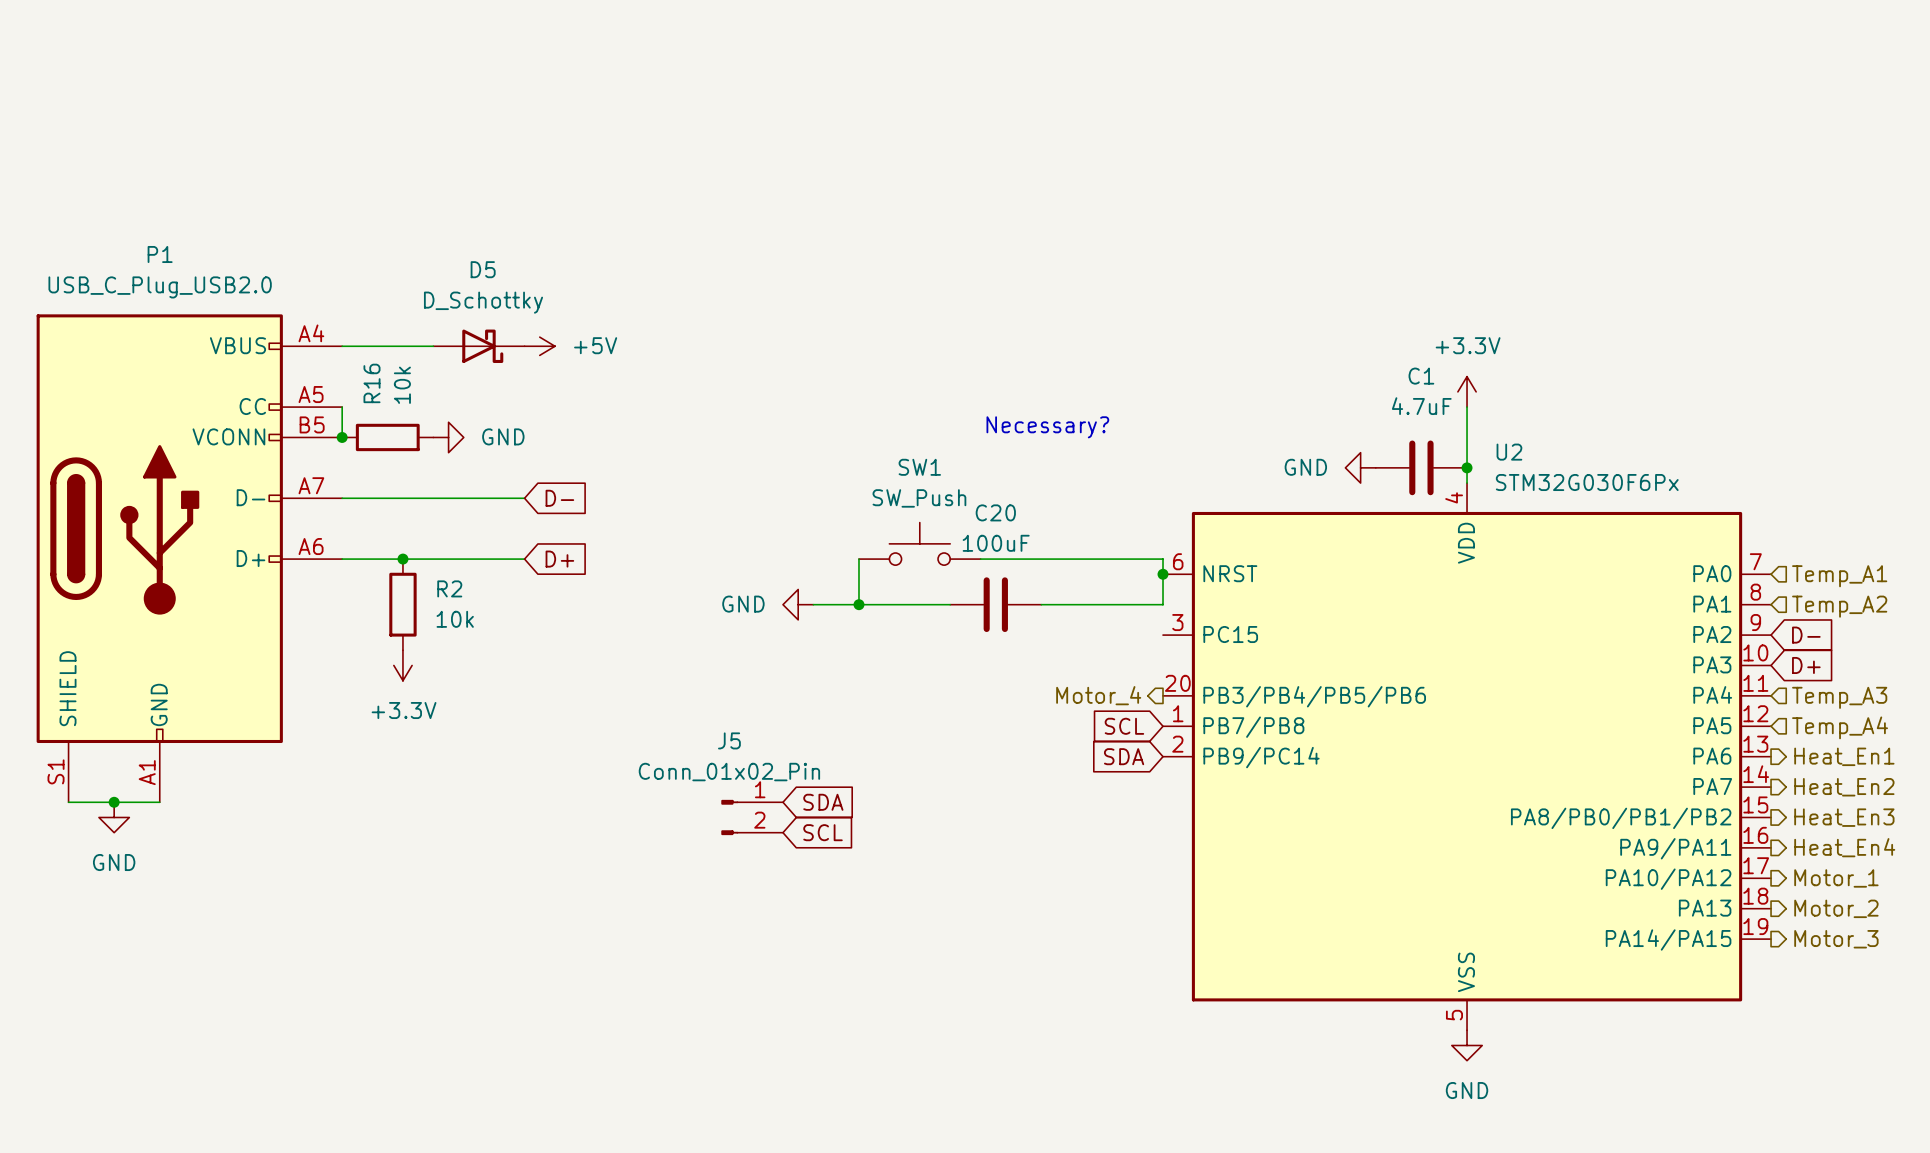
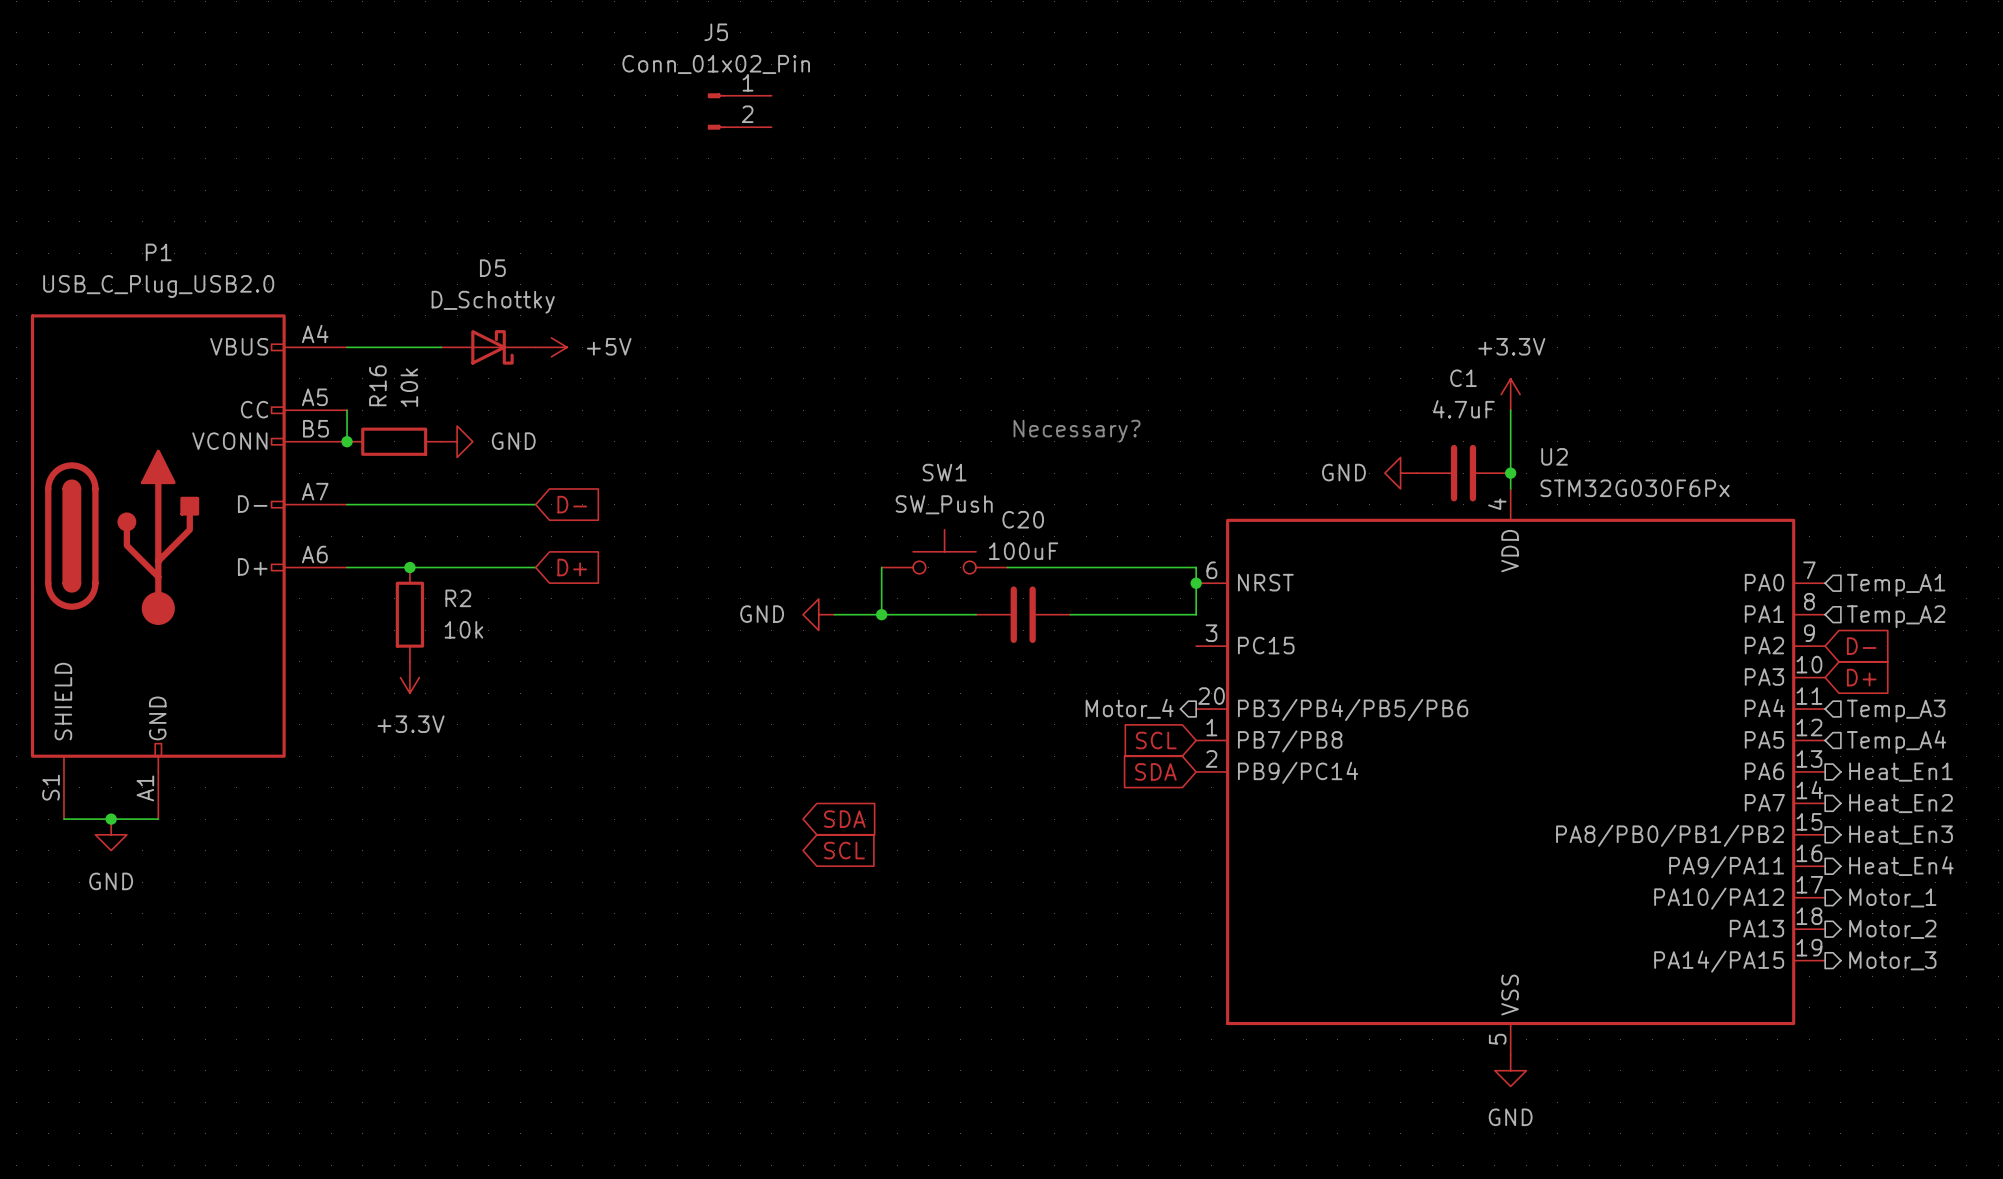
J5 position: (752, 817) -> (739, 111)

